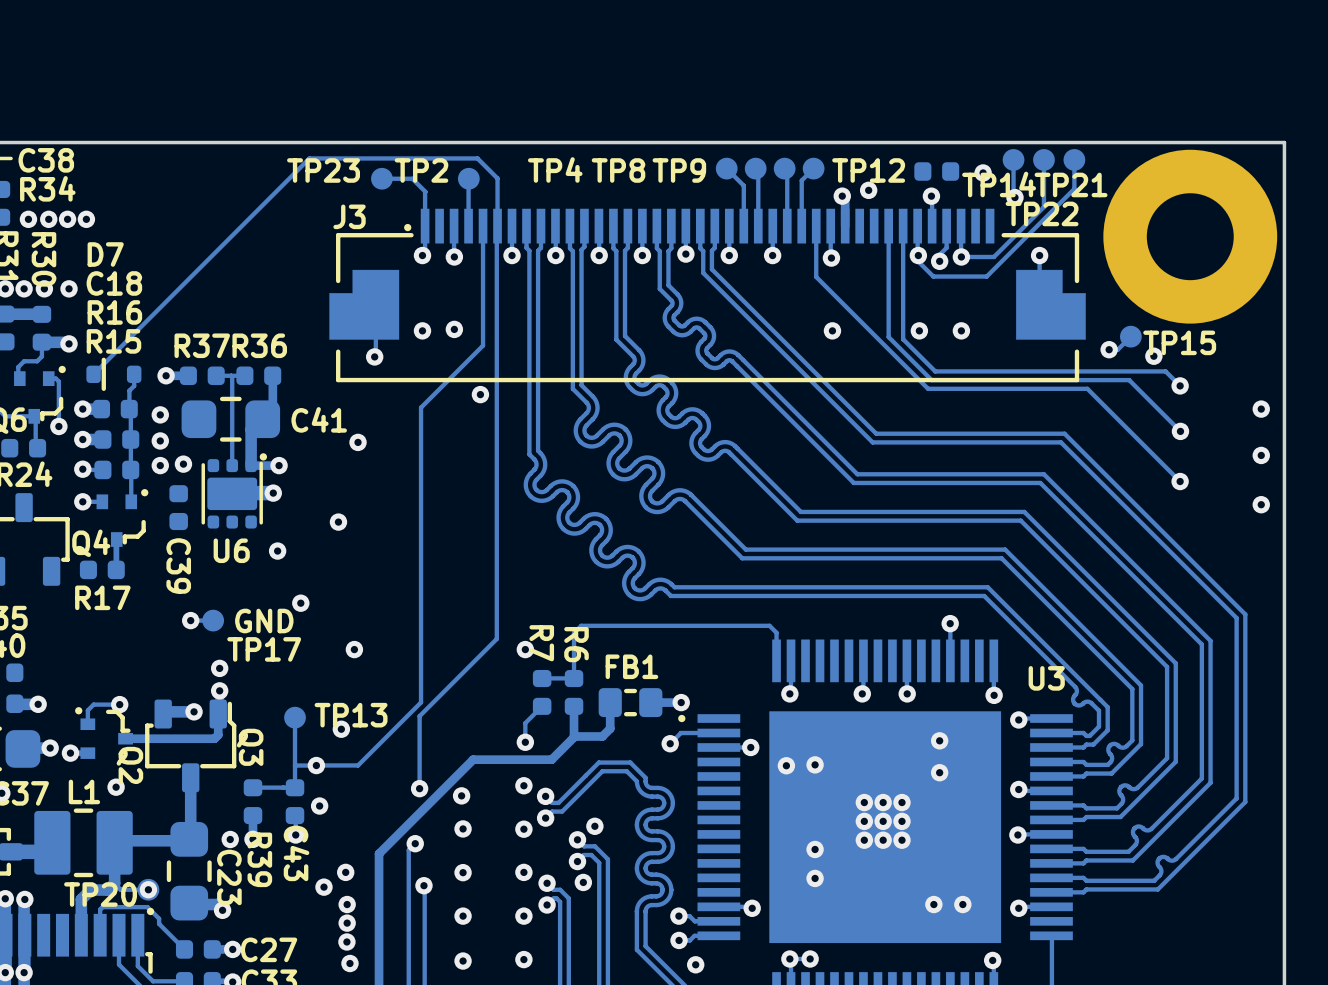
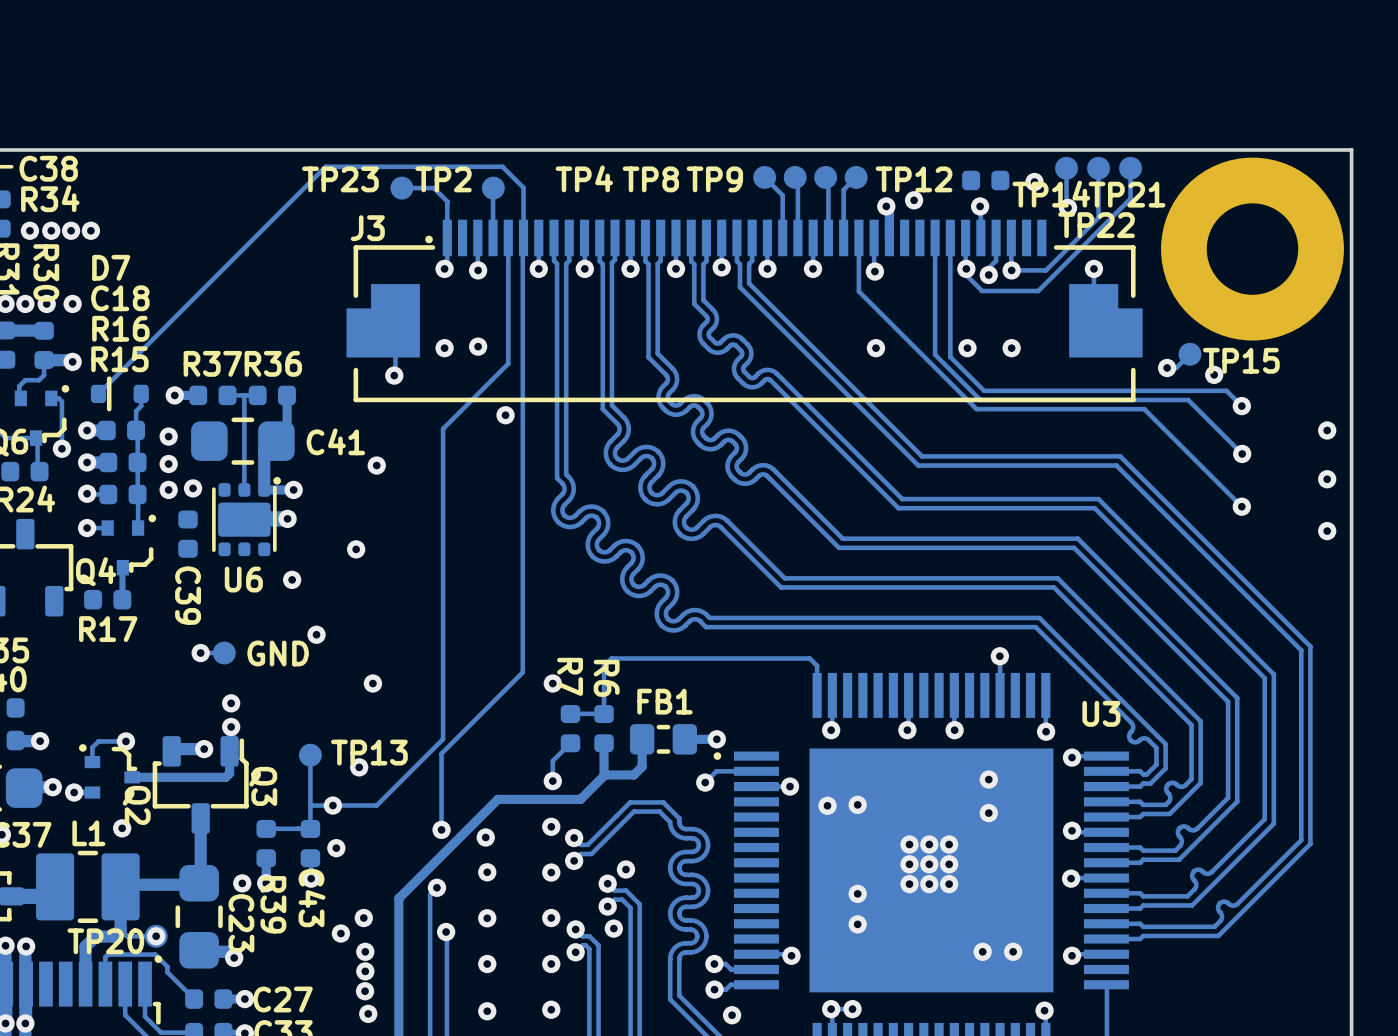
TP17 name: TP17 (264, 649) -> none

